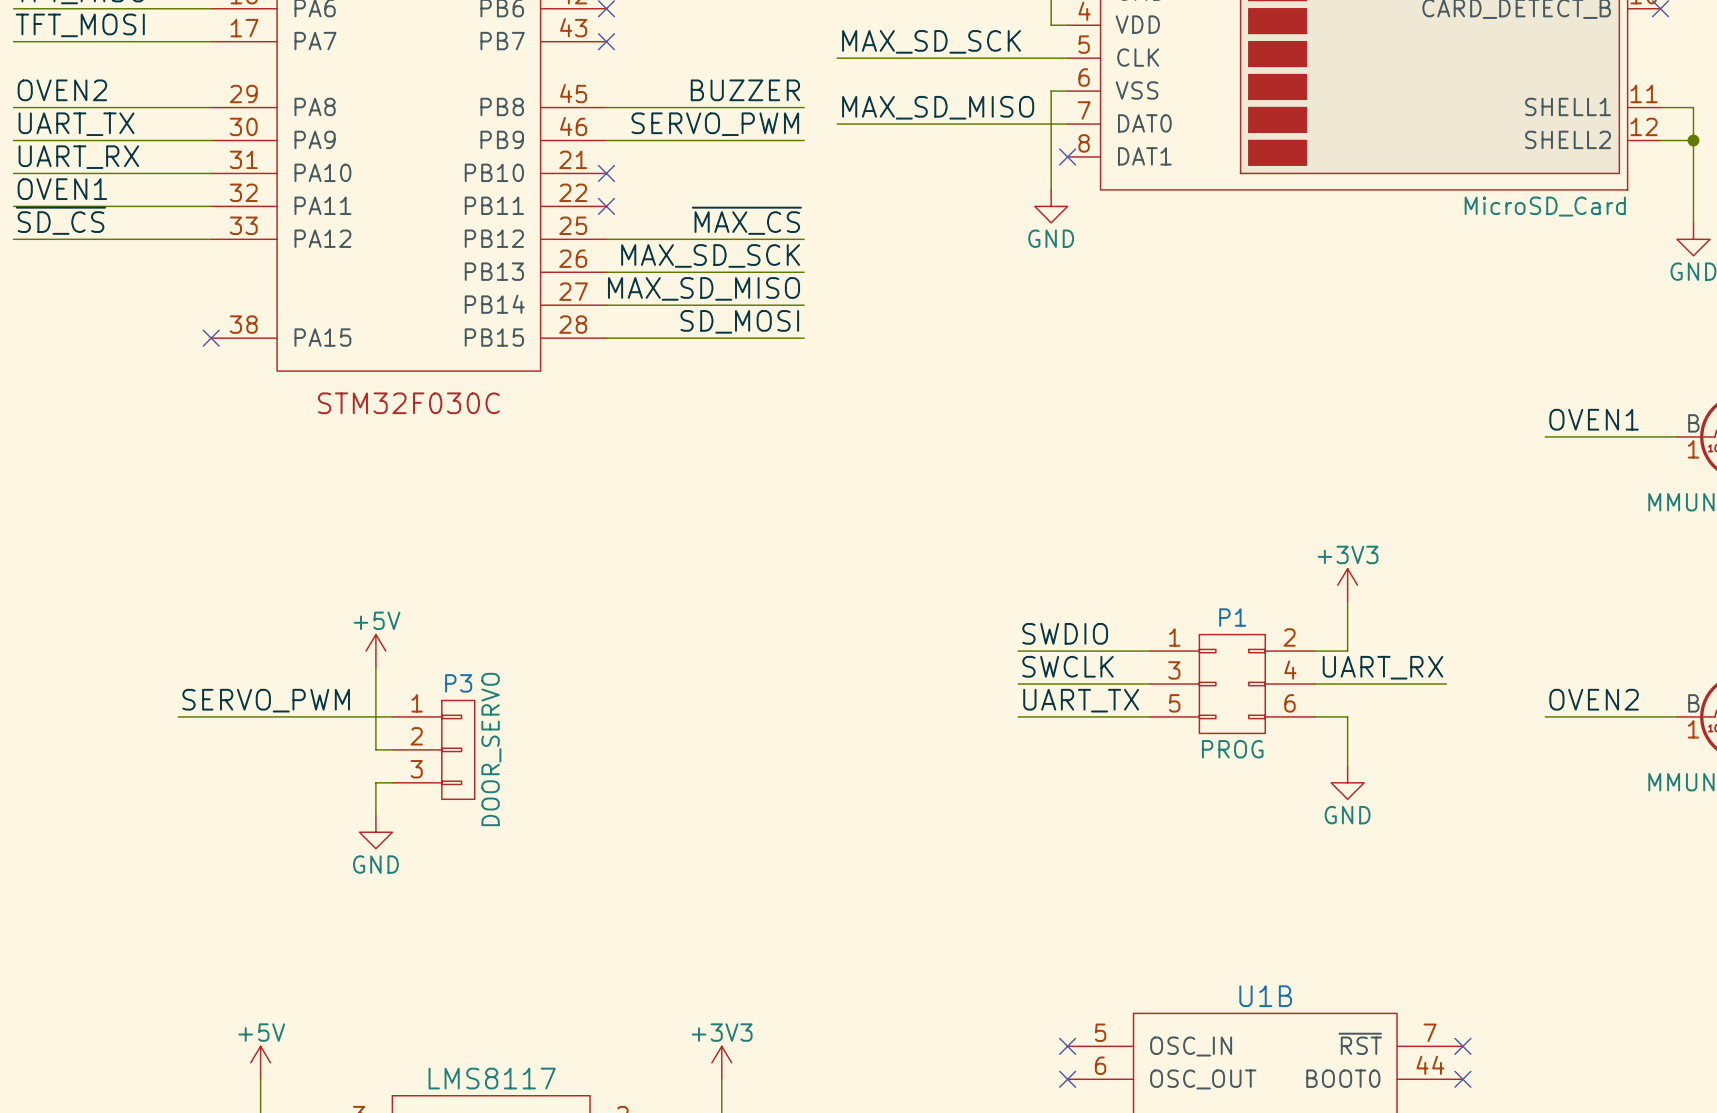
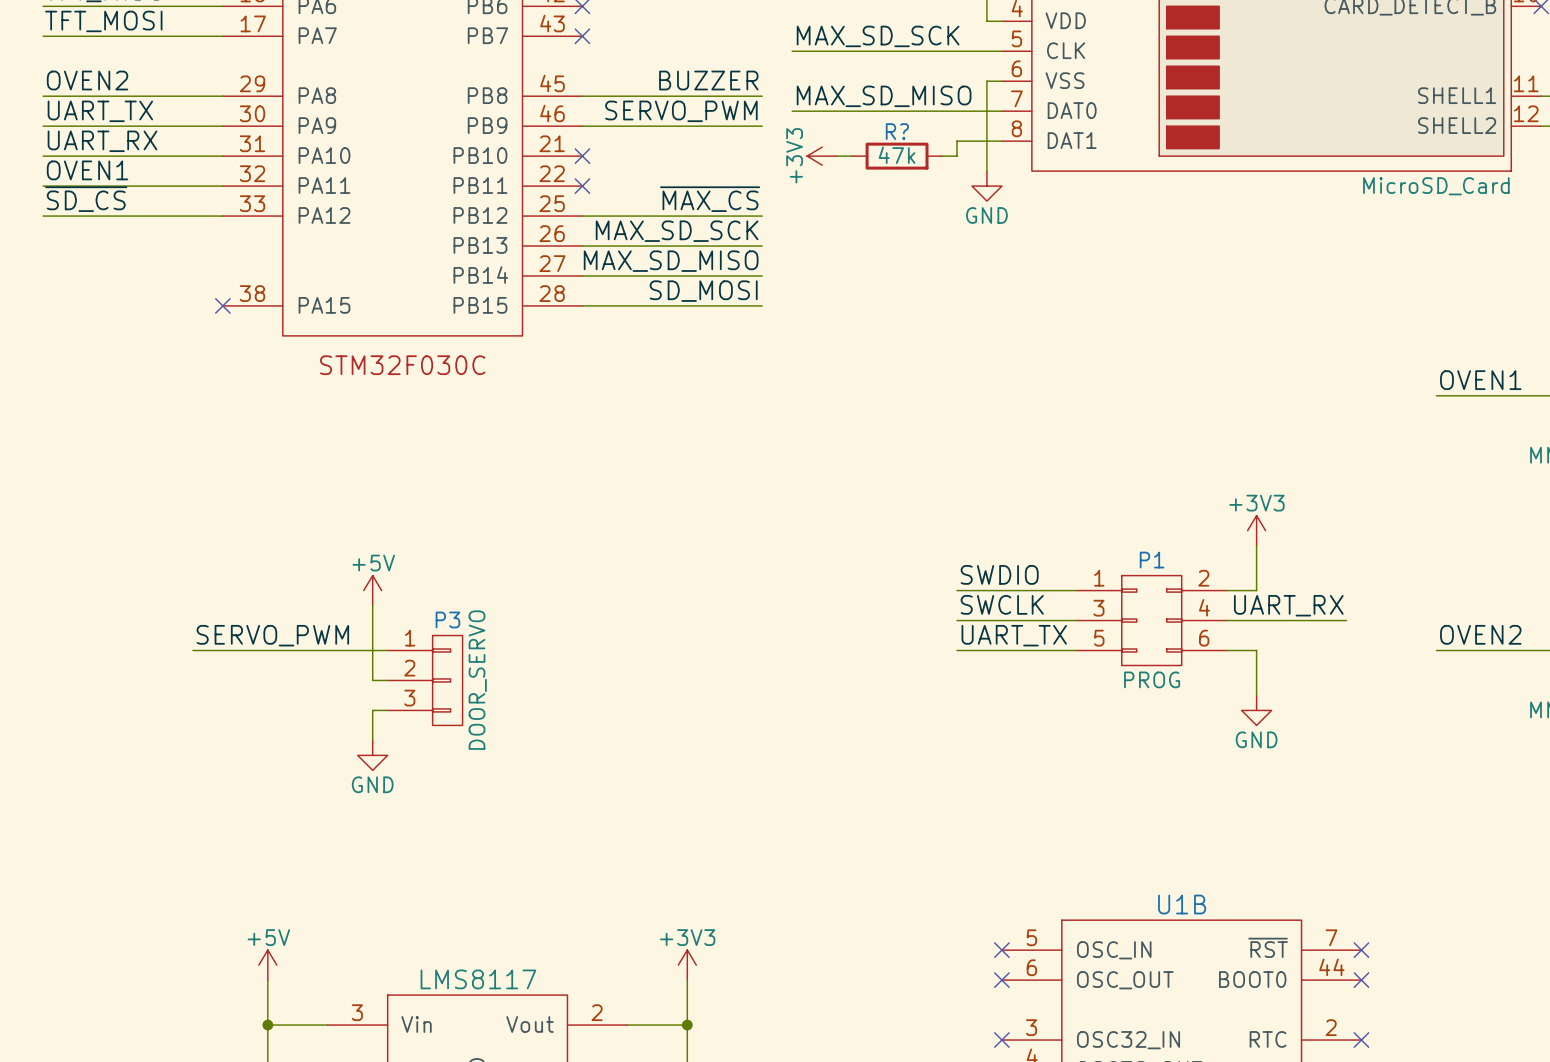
wire: none -> (1001, 141) (956, 141) (956, 156) (941, 156)
no-connect mark: (1067, 156) -> none
power symbol: none -> +3V3 (822, 156)
wire: none -> (837, 156) (852, 156)
R?: none -> 47k (897, 156)

